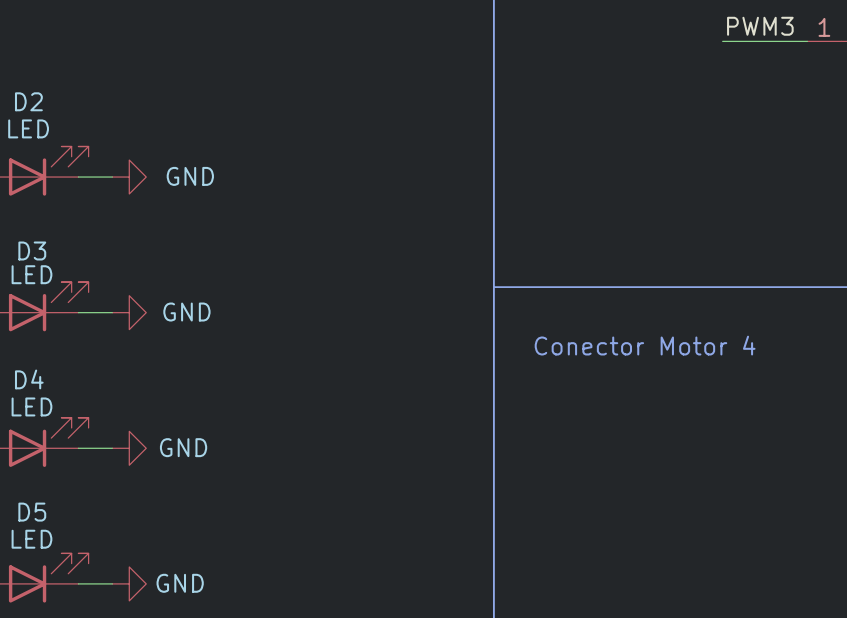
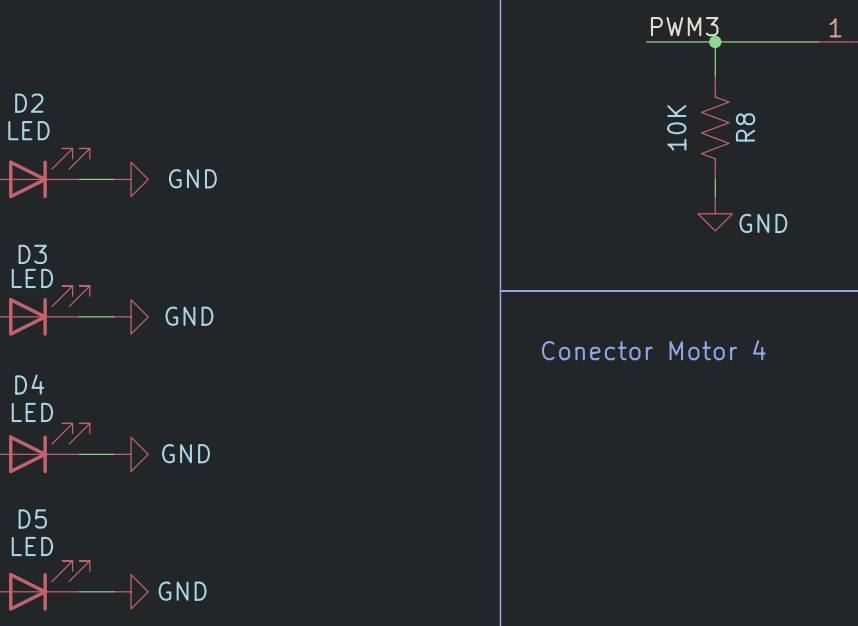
label position: PWM3 (760, 26) -> PWM3 (684, 26)
wire: none -> (646, 41) (732, 41)
wire: none -> (715, 41) (715, 76)
junction: none -> (715, 41)
R8: none -> 10K (715, 127)
wire: none -> (715, 179) (715, 196)
power symbol: none -> GND (715, 213)

